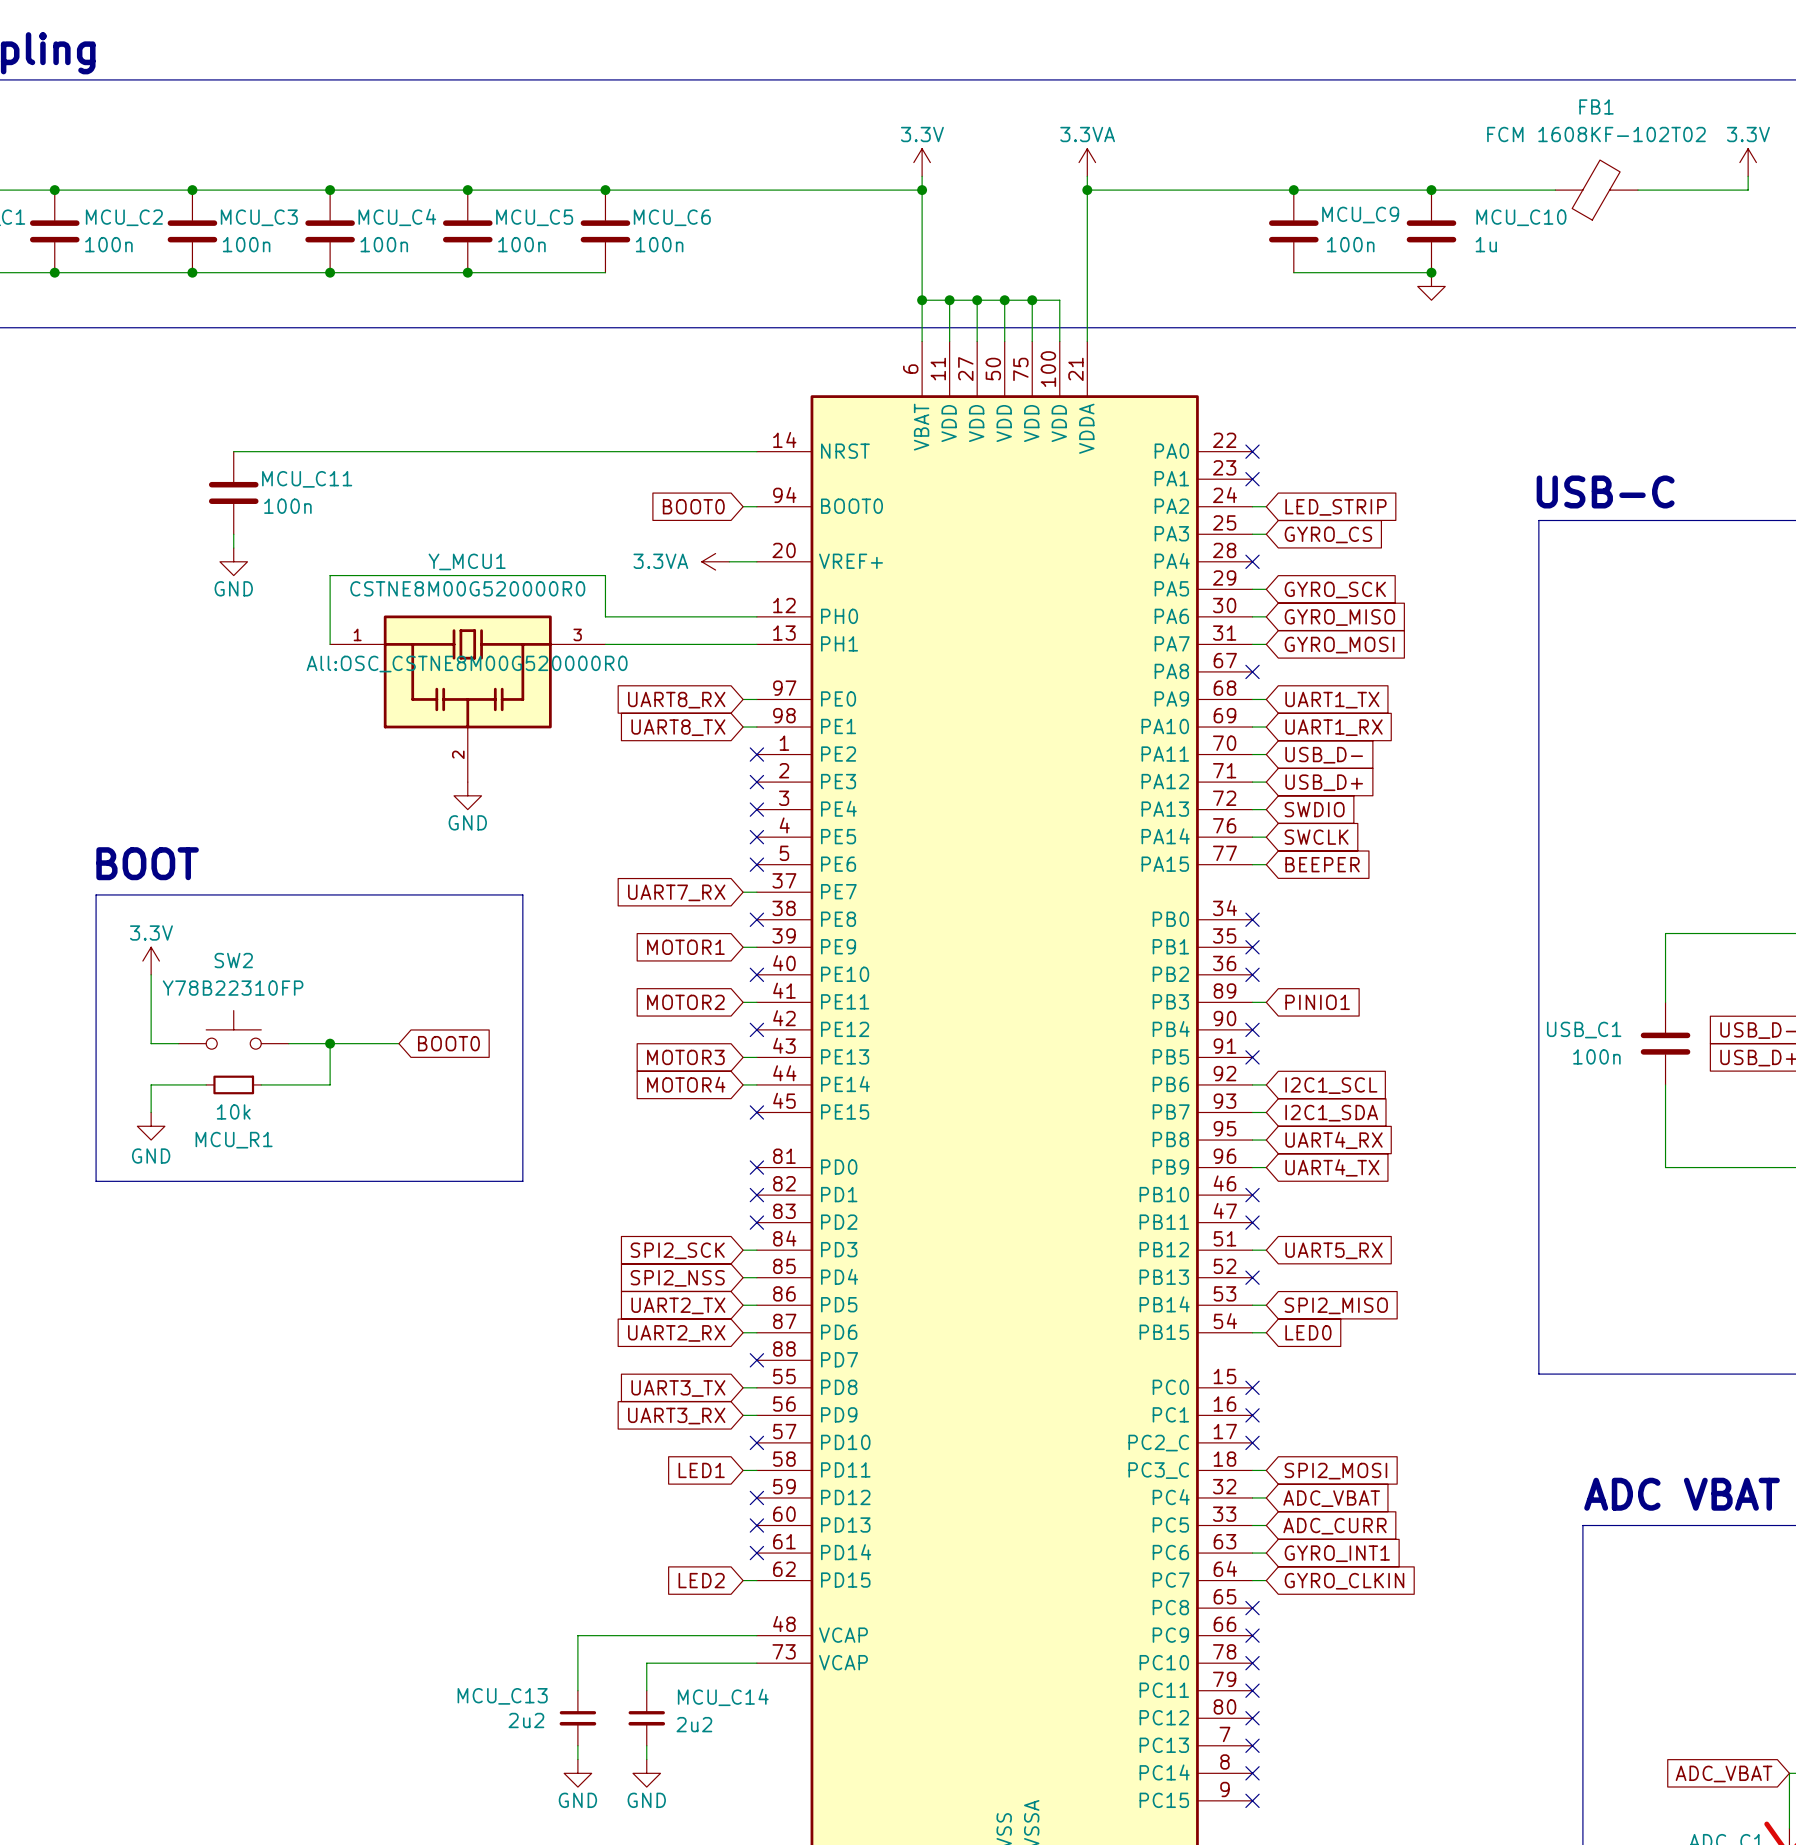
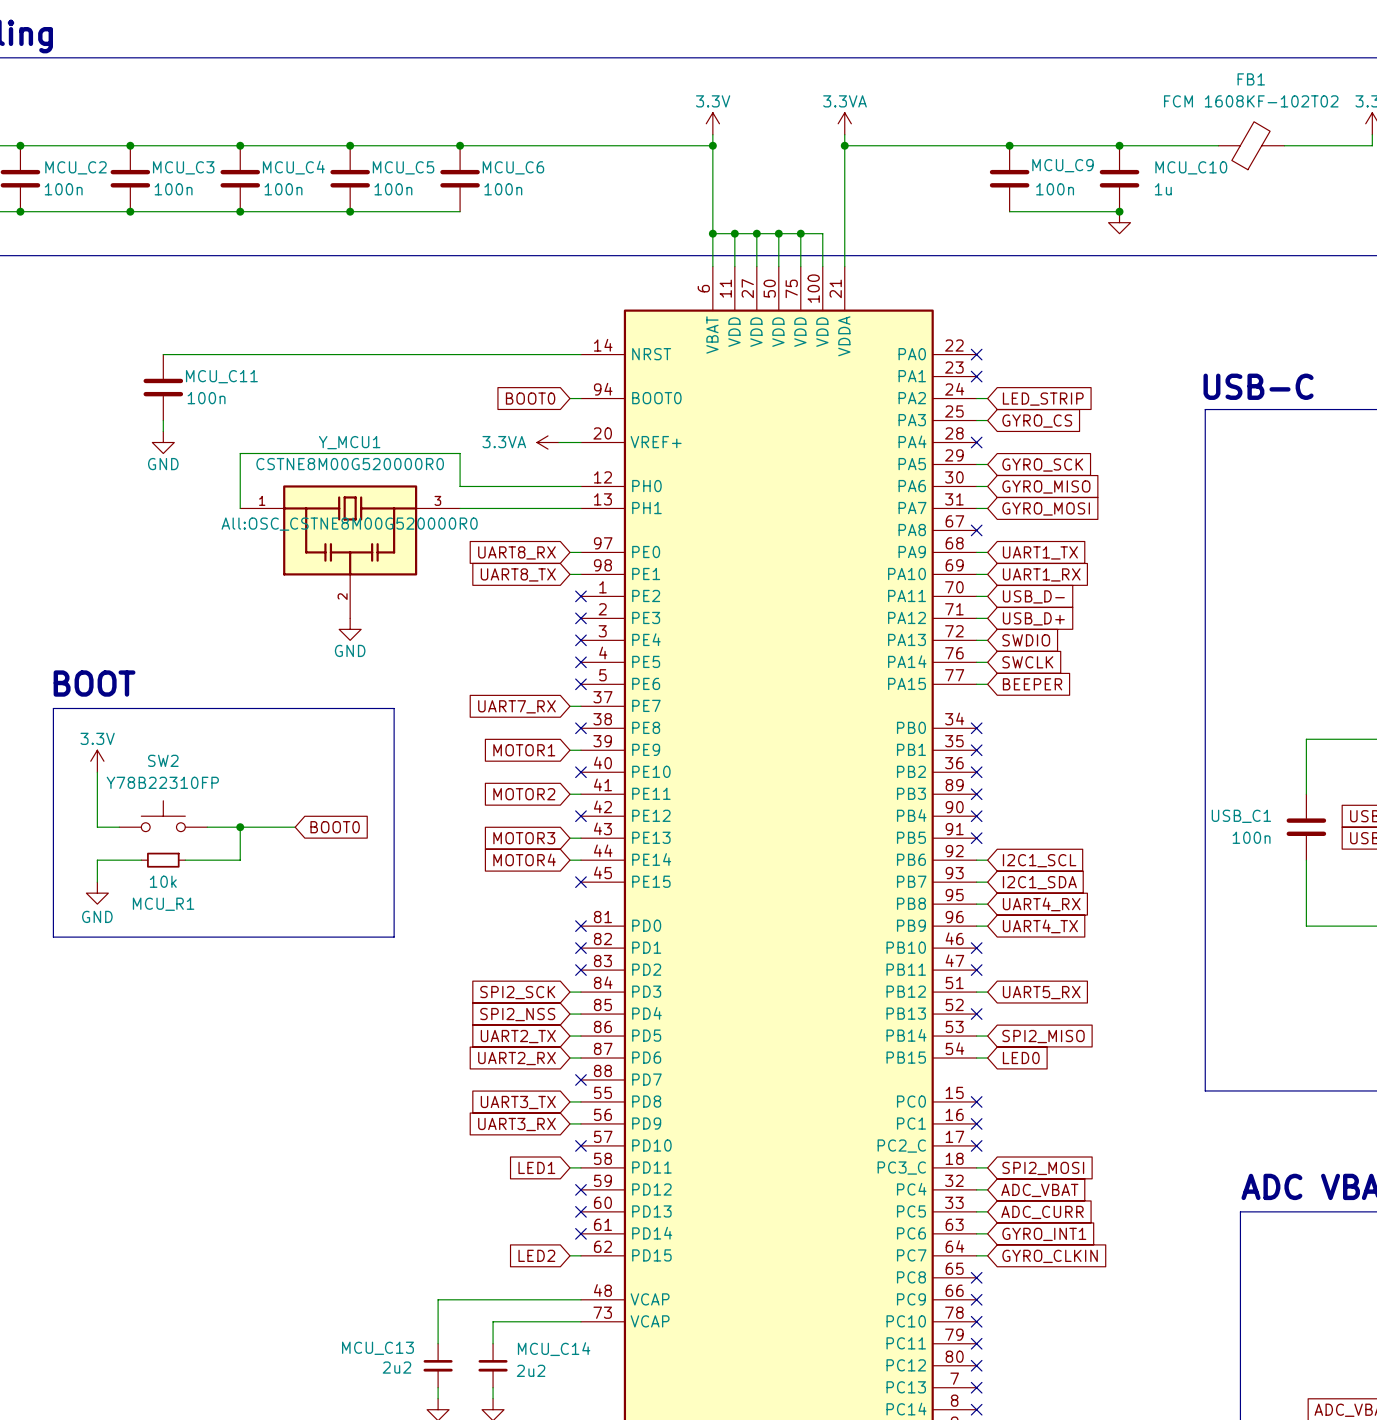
wire: (1252, 1002) (1266, 1002) -> none
no-connect mark: none -> (976, 794)
global label: PINIO1 (1317, 1002) -> none

